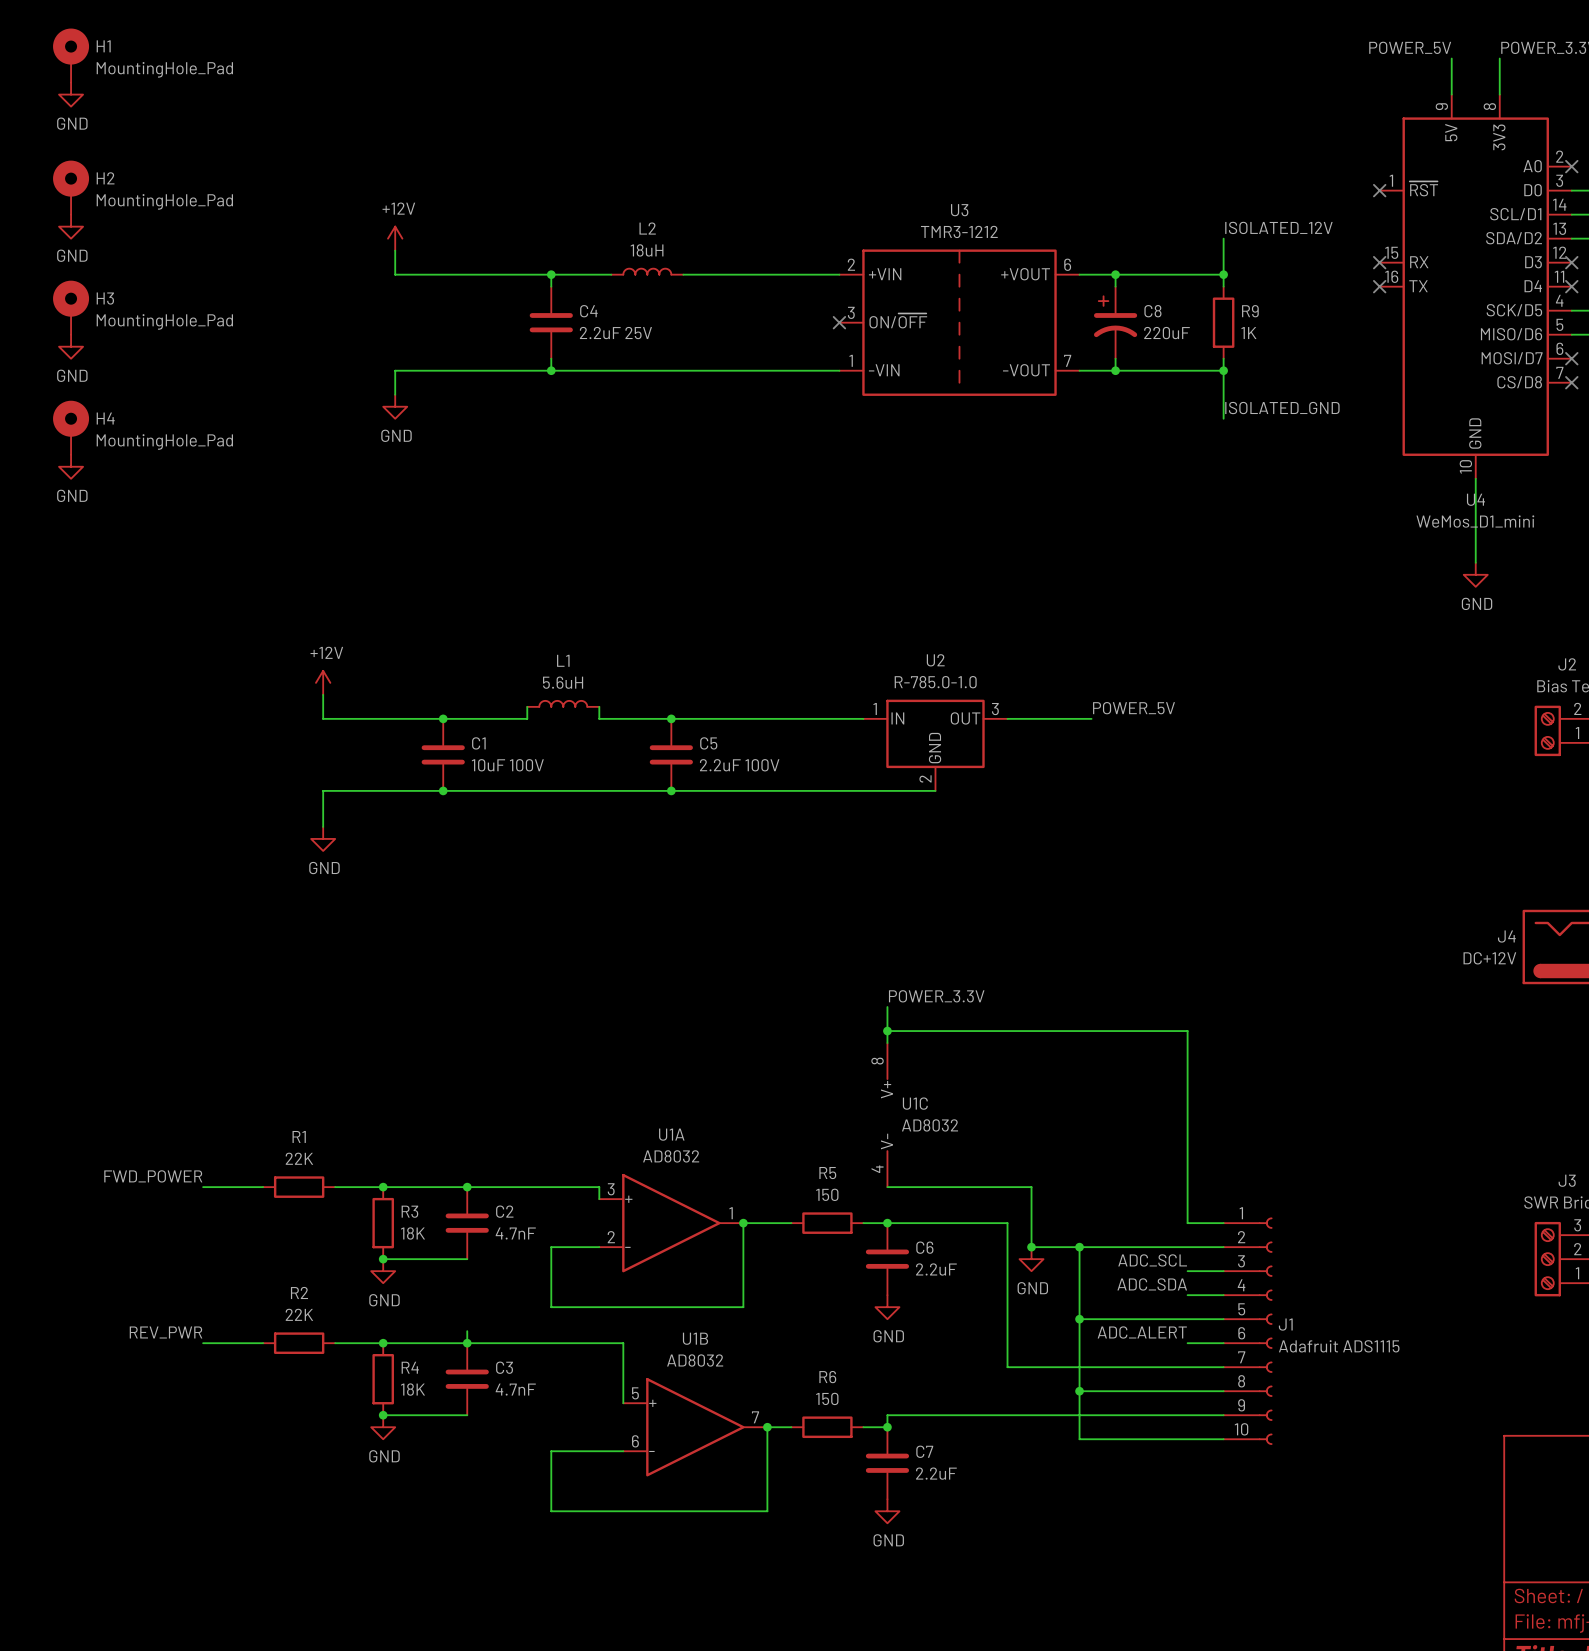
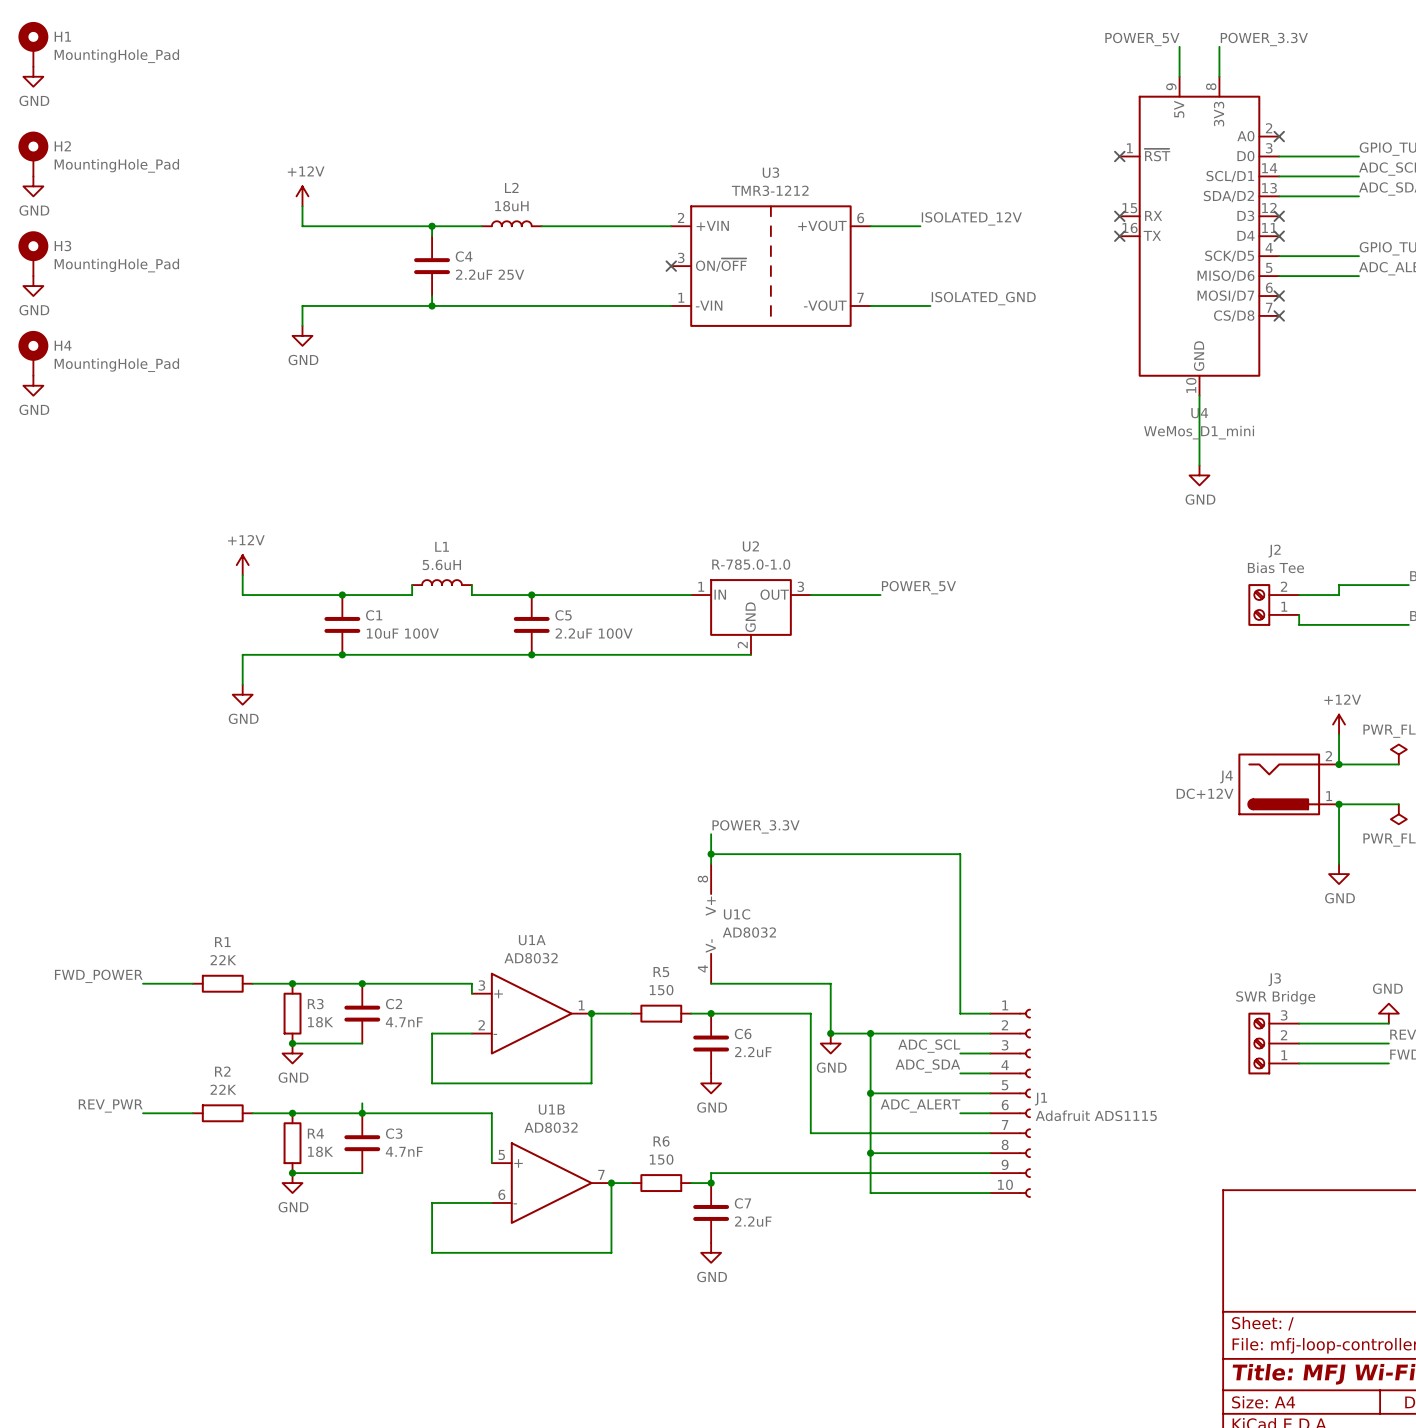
label position: ISOLATED_12V (1278, 227) -> ISOLATED_12V (971, 218)
wire: (1223, 238) (1223, 286) -> none
wire: (1115, 274) (1115, 286) -> none
junction: (1115, 274) -> none
wire: (1139, 274) (1223, 274) -> none
junction: (1223, 274) -> none
C8: 220uF (1115, 322) -> none
R9: 1K (1223, 322) -> none
wire: (1115, 358) (1115, 370) -> none
wire: (1223, 358) (1223, 418) -> none
junction: (1115, 370) -> none
wire: (1151, 370) (1223, 370) -> none
junction: (1223, 370) -> none
label position: ISOLATED_GND (1282, 408) -> ISOLATED_GND (983, 298)

